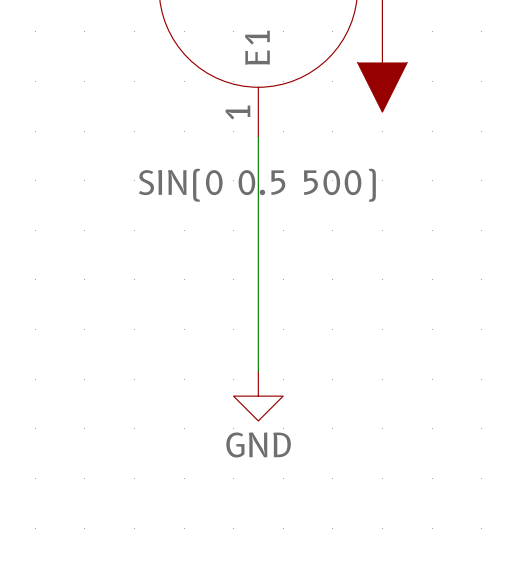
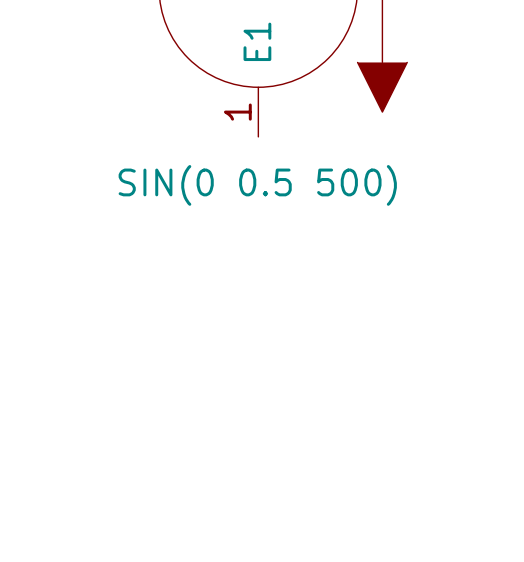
wire: (258, 136) (258, 371) -> none
power symbol: GND (258, 396) -> none

